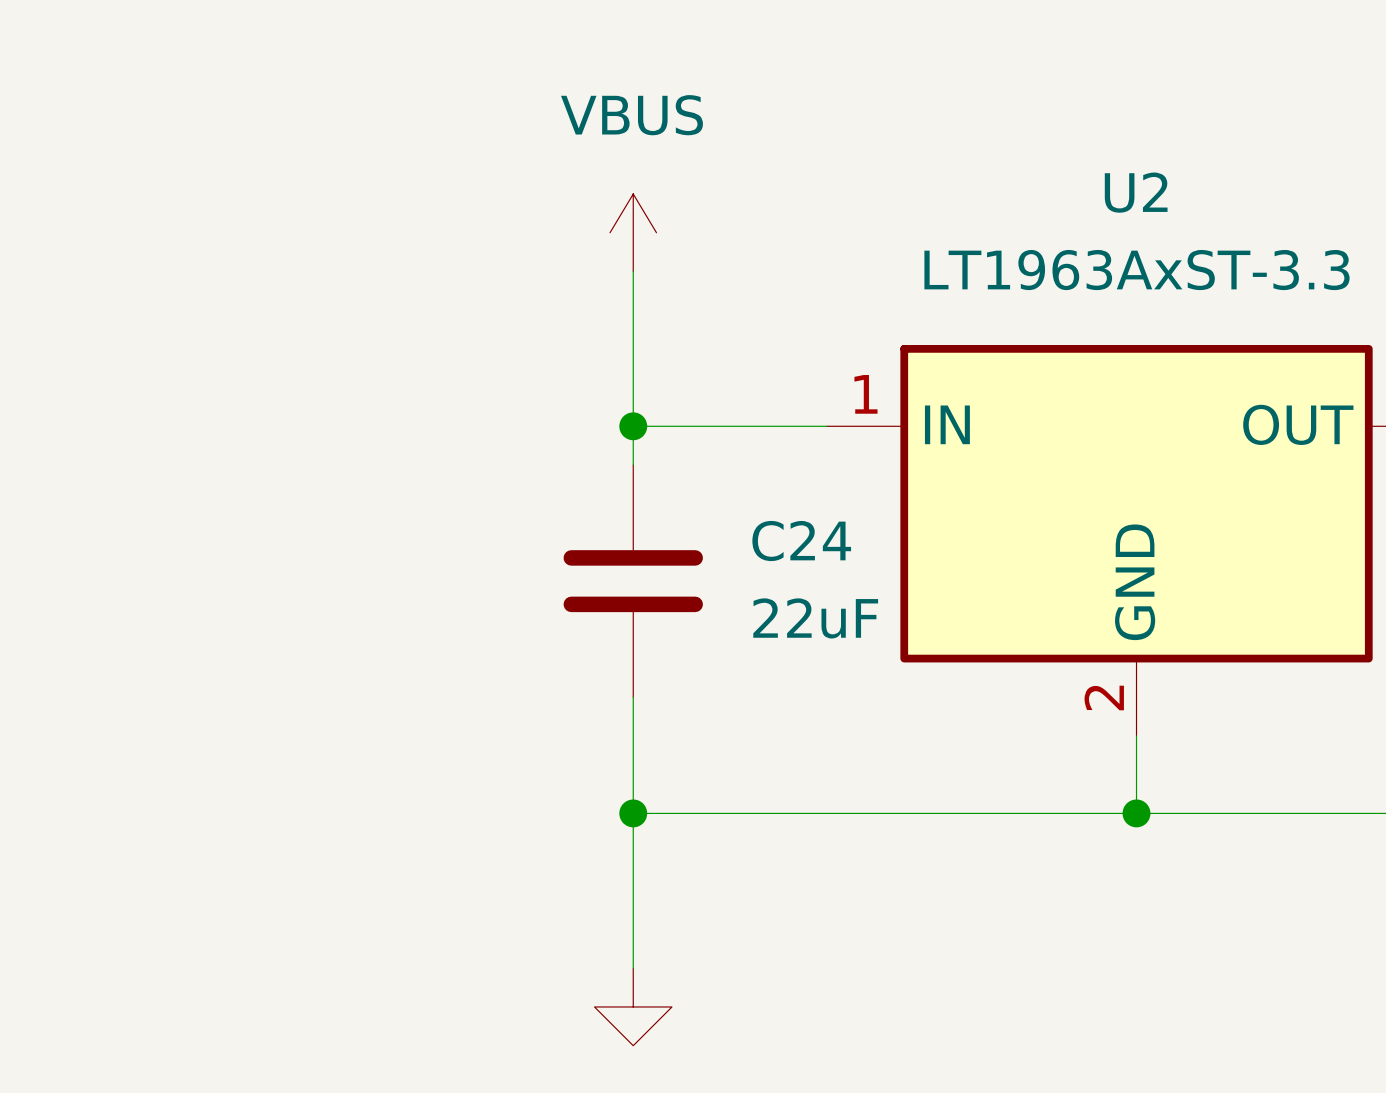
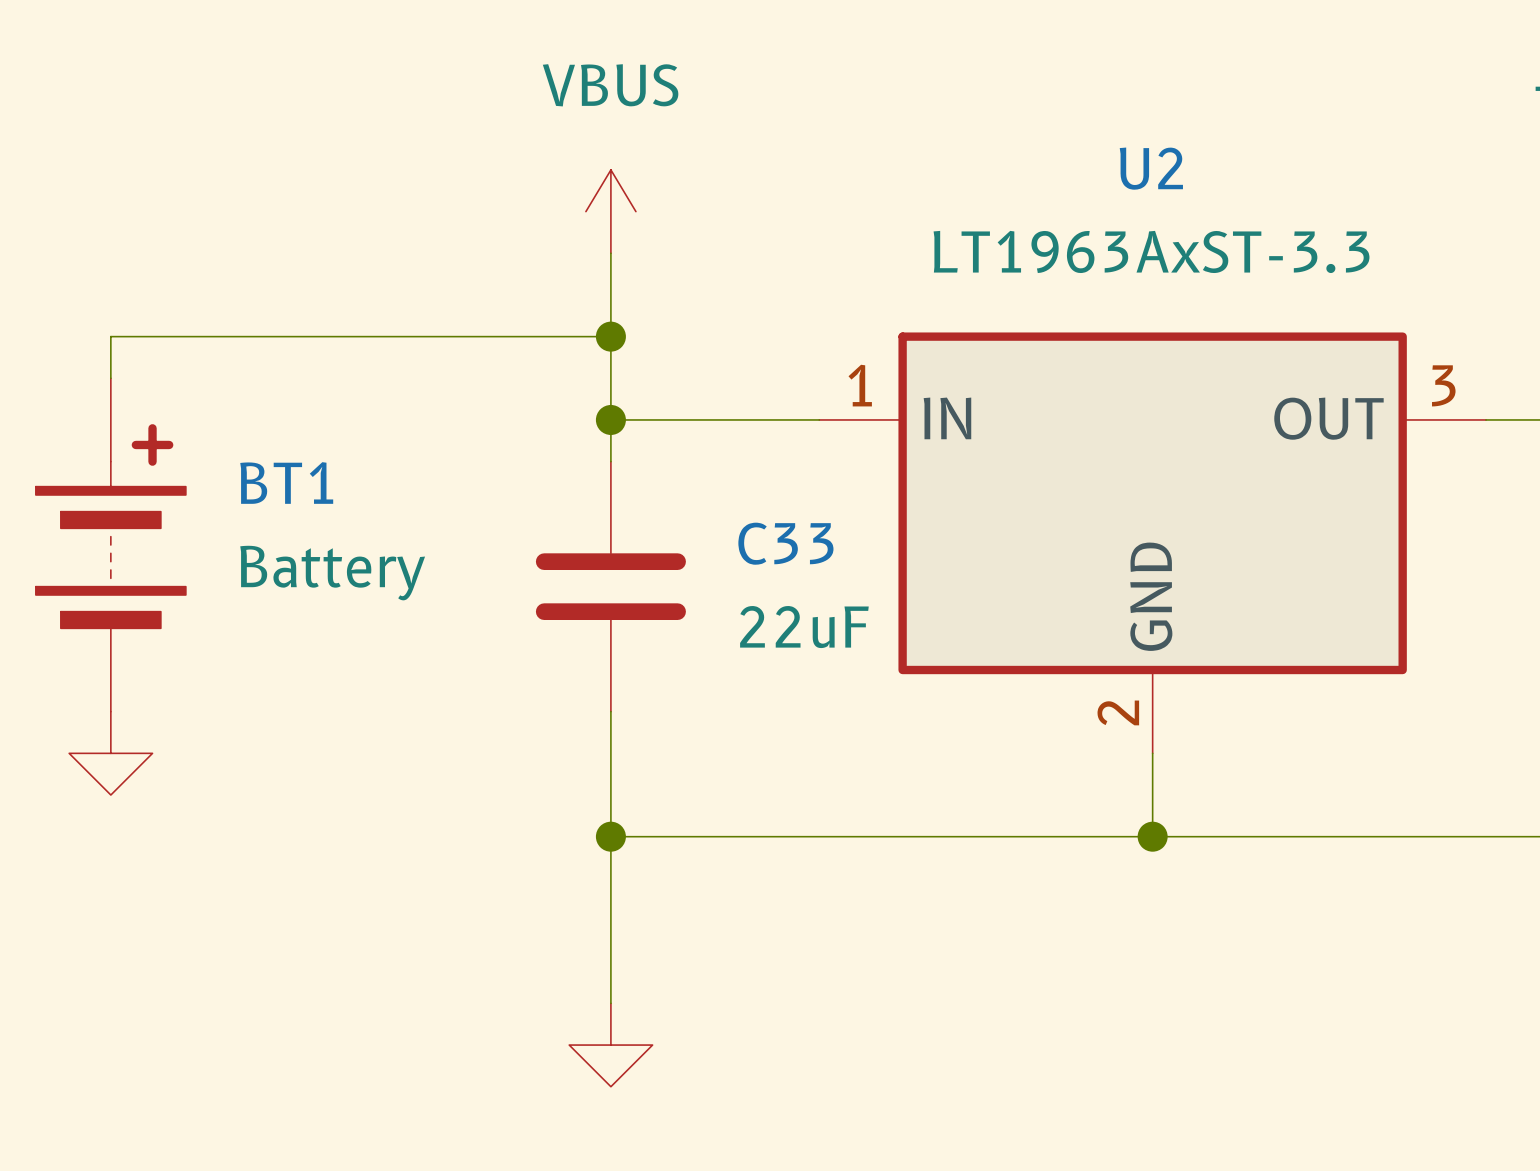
wire: none -> (610, 336) (110, 336) (110, 378)
junction: none -> (610, 336)
C24 name: C24 (801, 541) -> C33 (785, 543)
BT1: none -> Battery (110, 544)
power symbol: none -> (110, 753)

